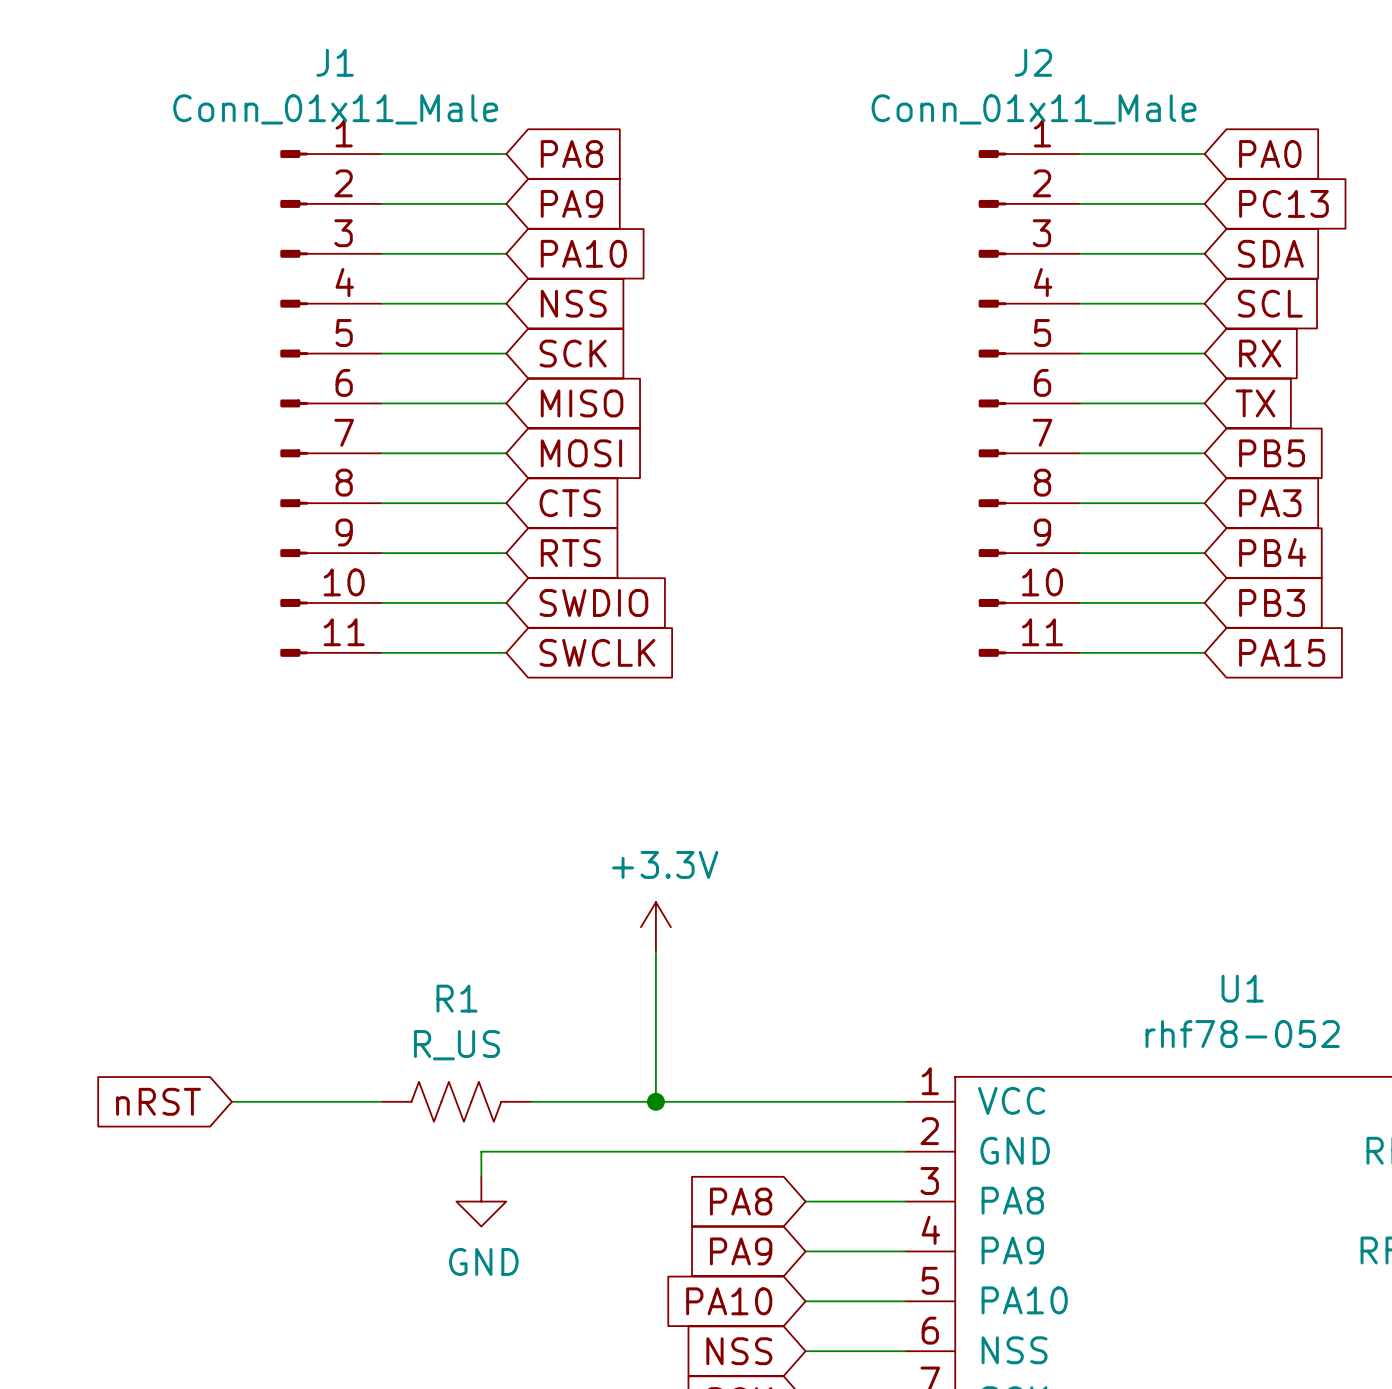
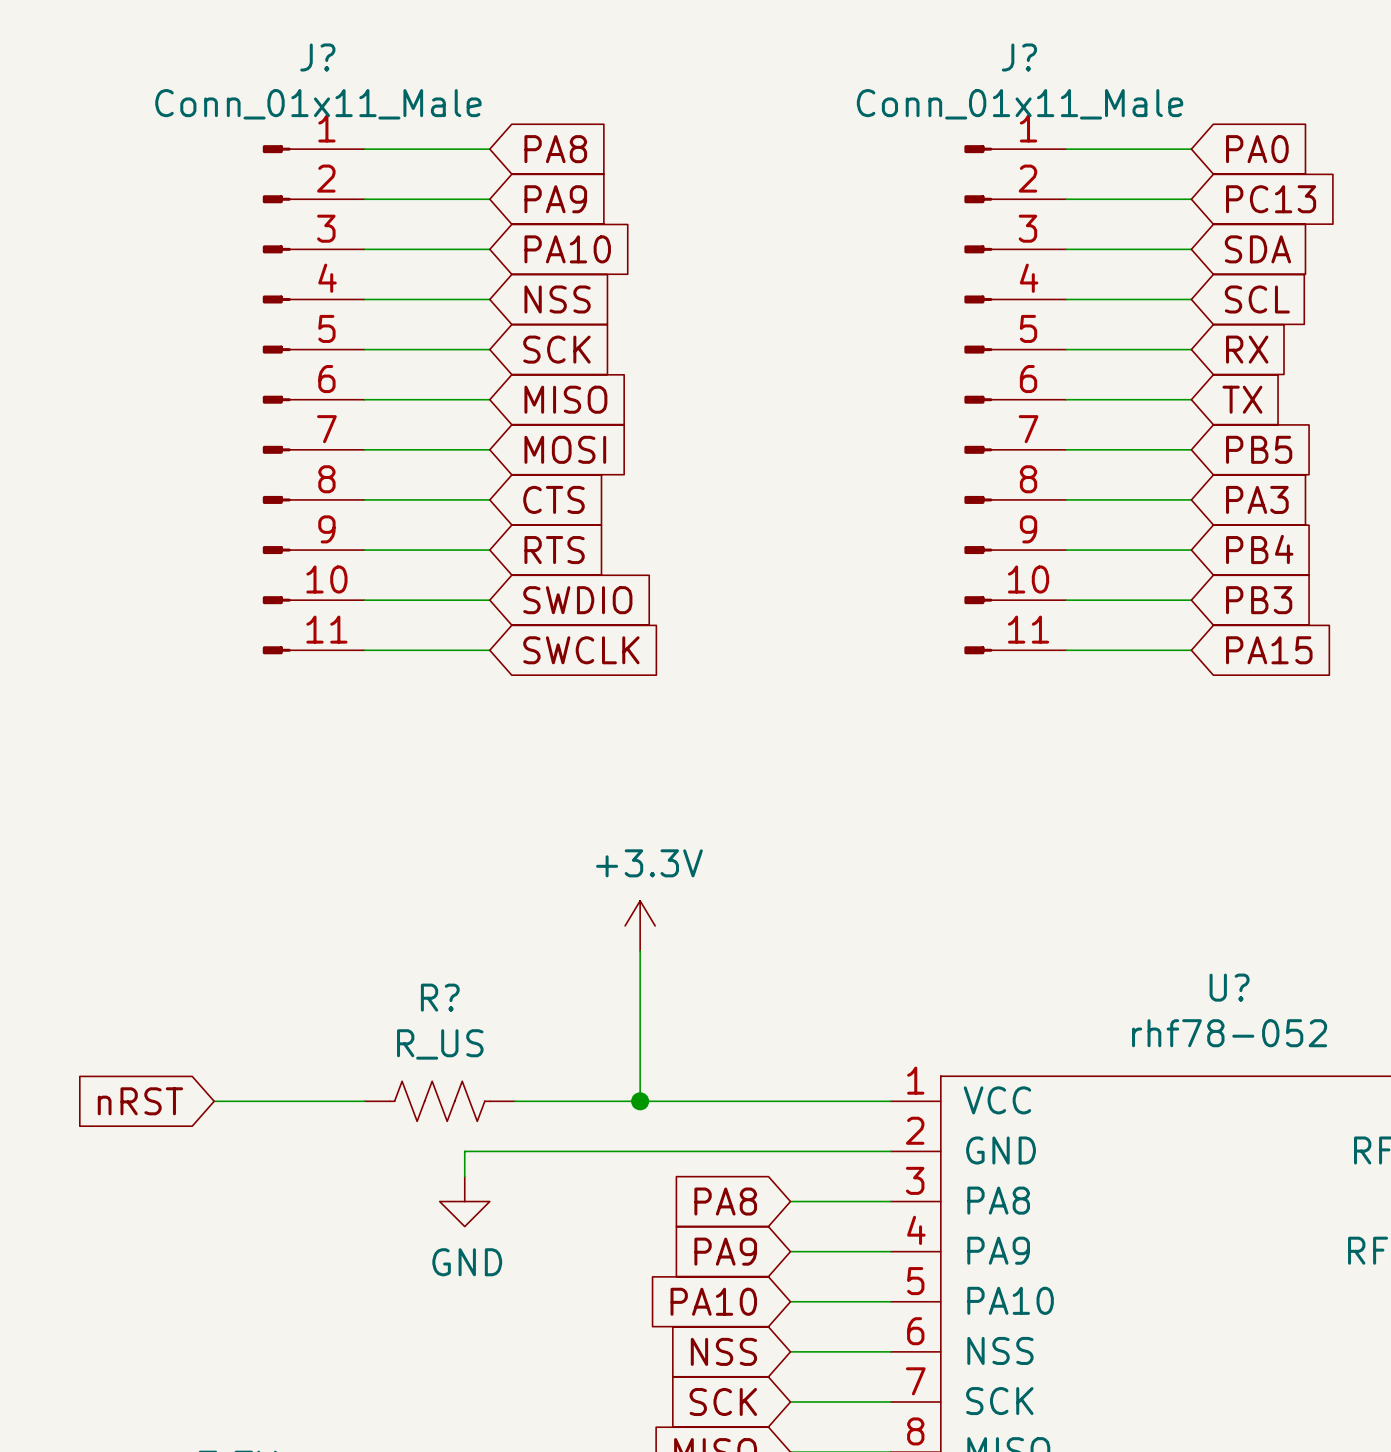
J1 name: J1 (335, 62) -> J? (317, 57)
J2 name: J2 (1033, 62) -> J? (1019, 57)
U1 name: U1 (1242, 988) -> U? (1229, 987)
R1 name: R1 (456, 998) -> R? (440, 997)

